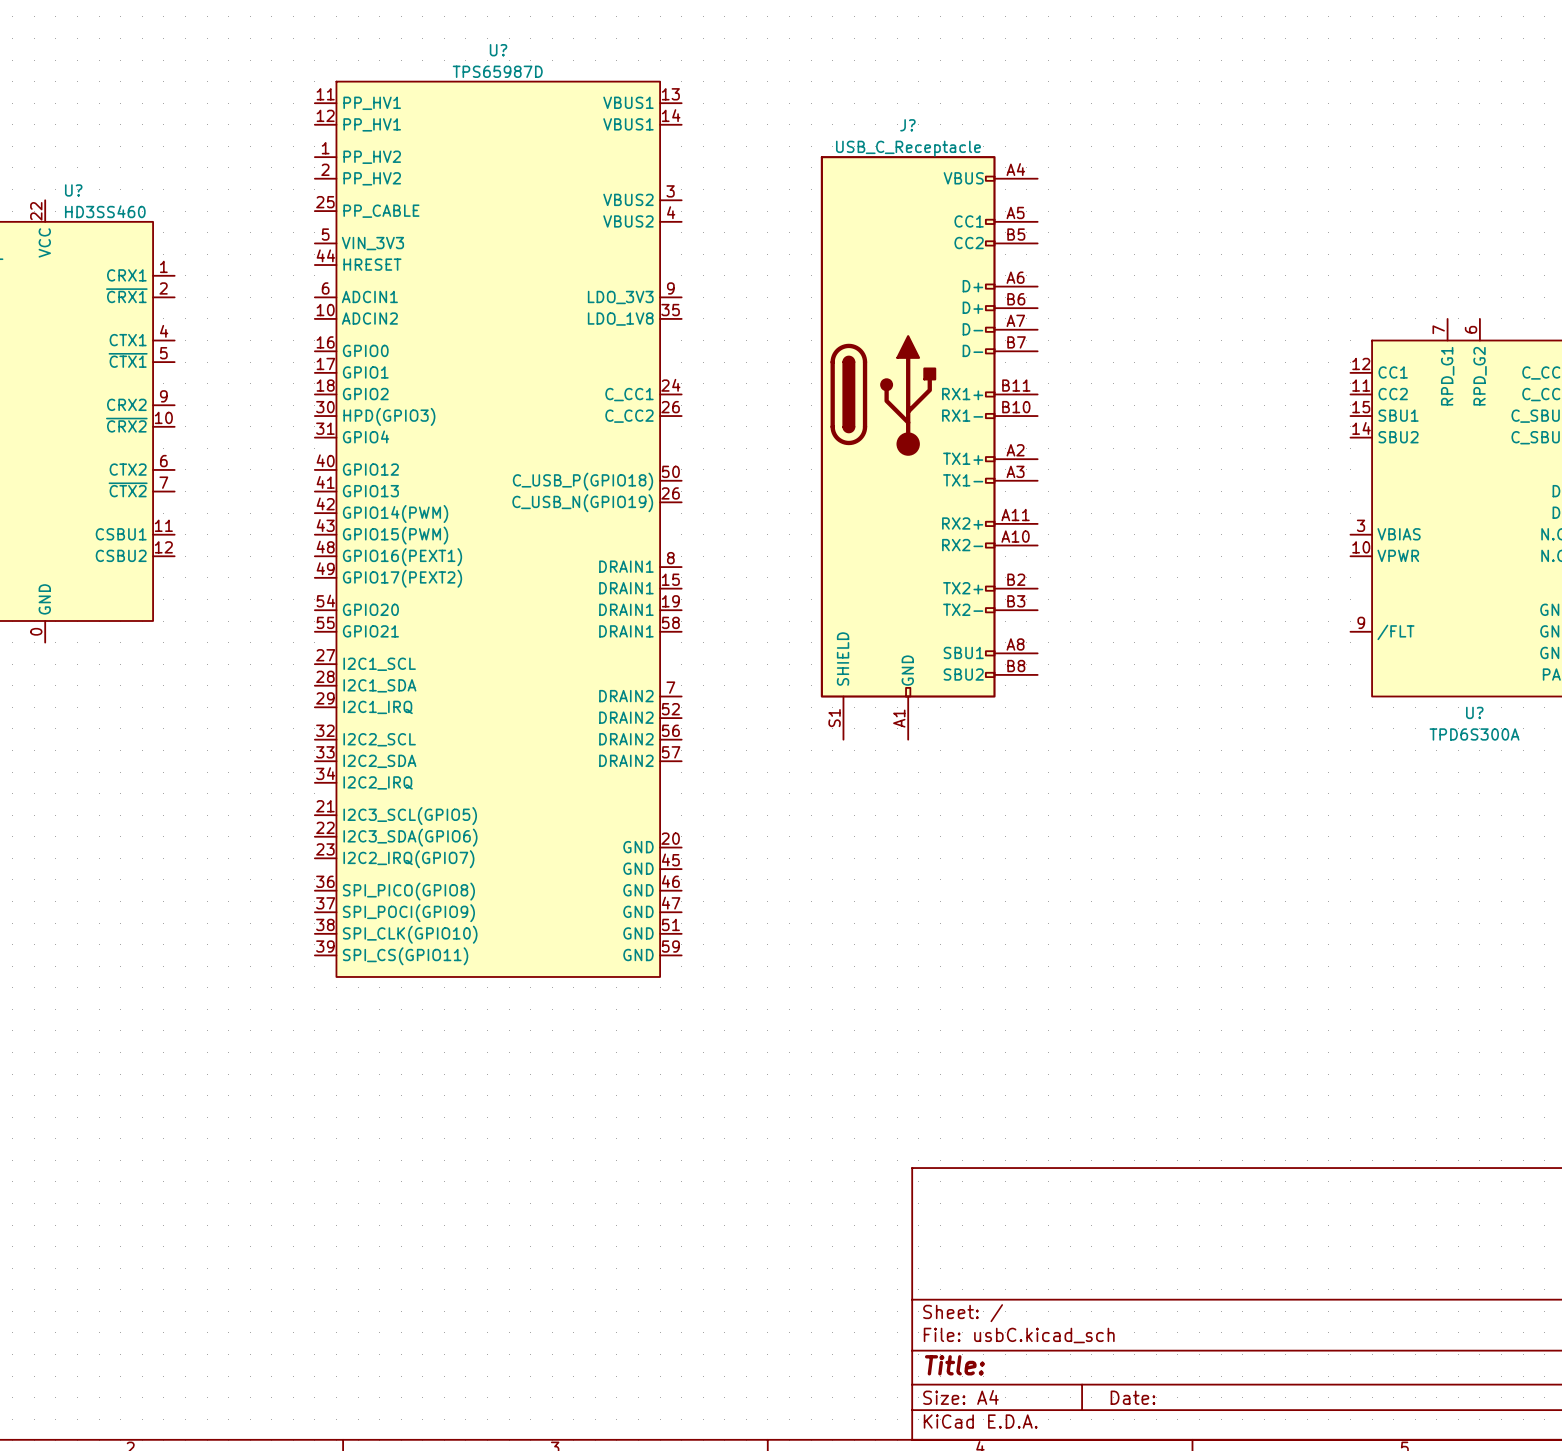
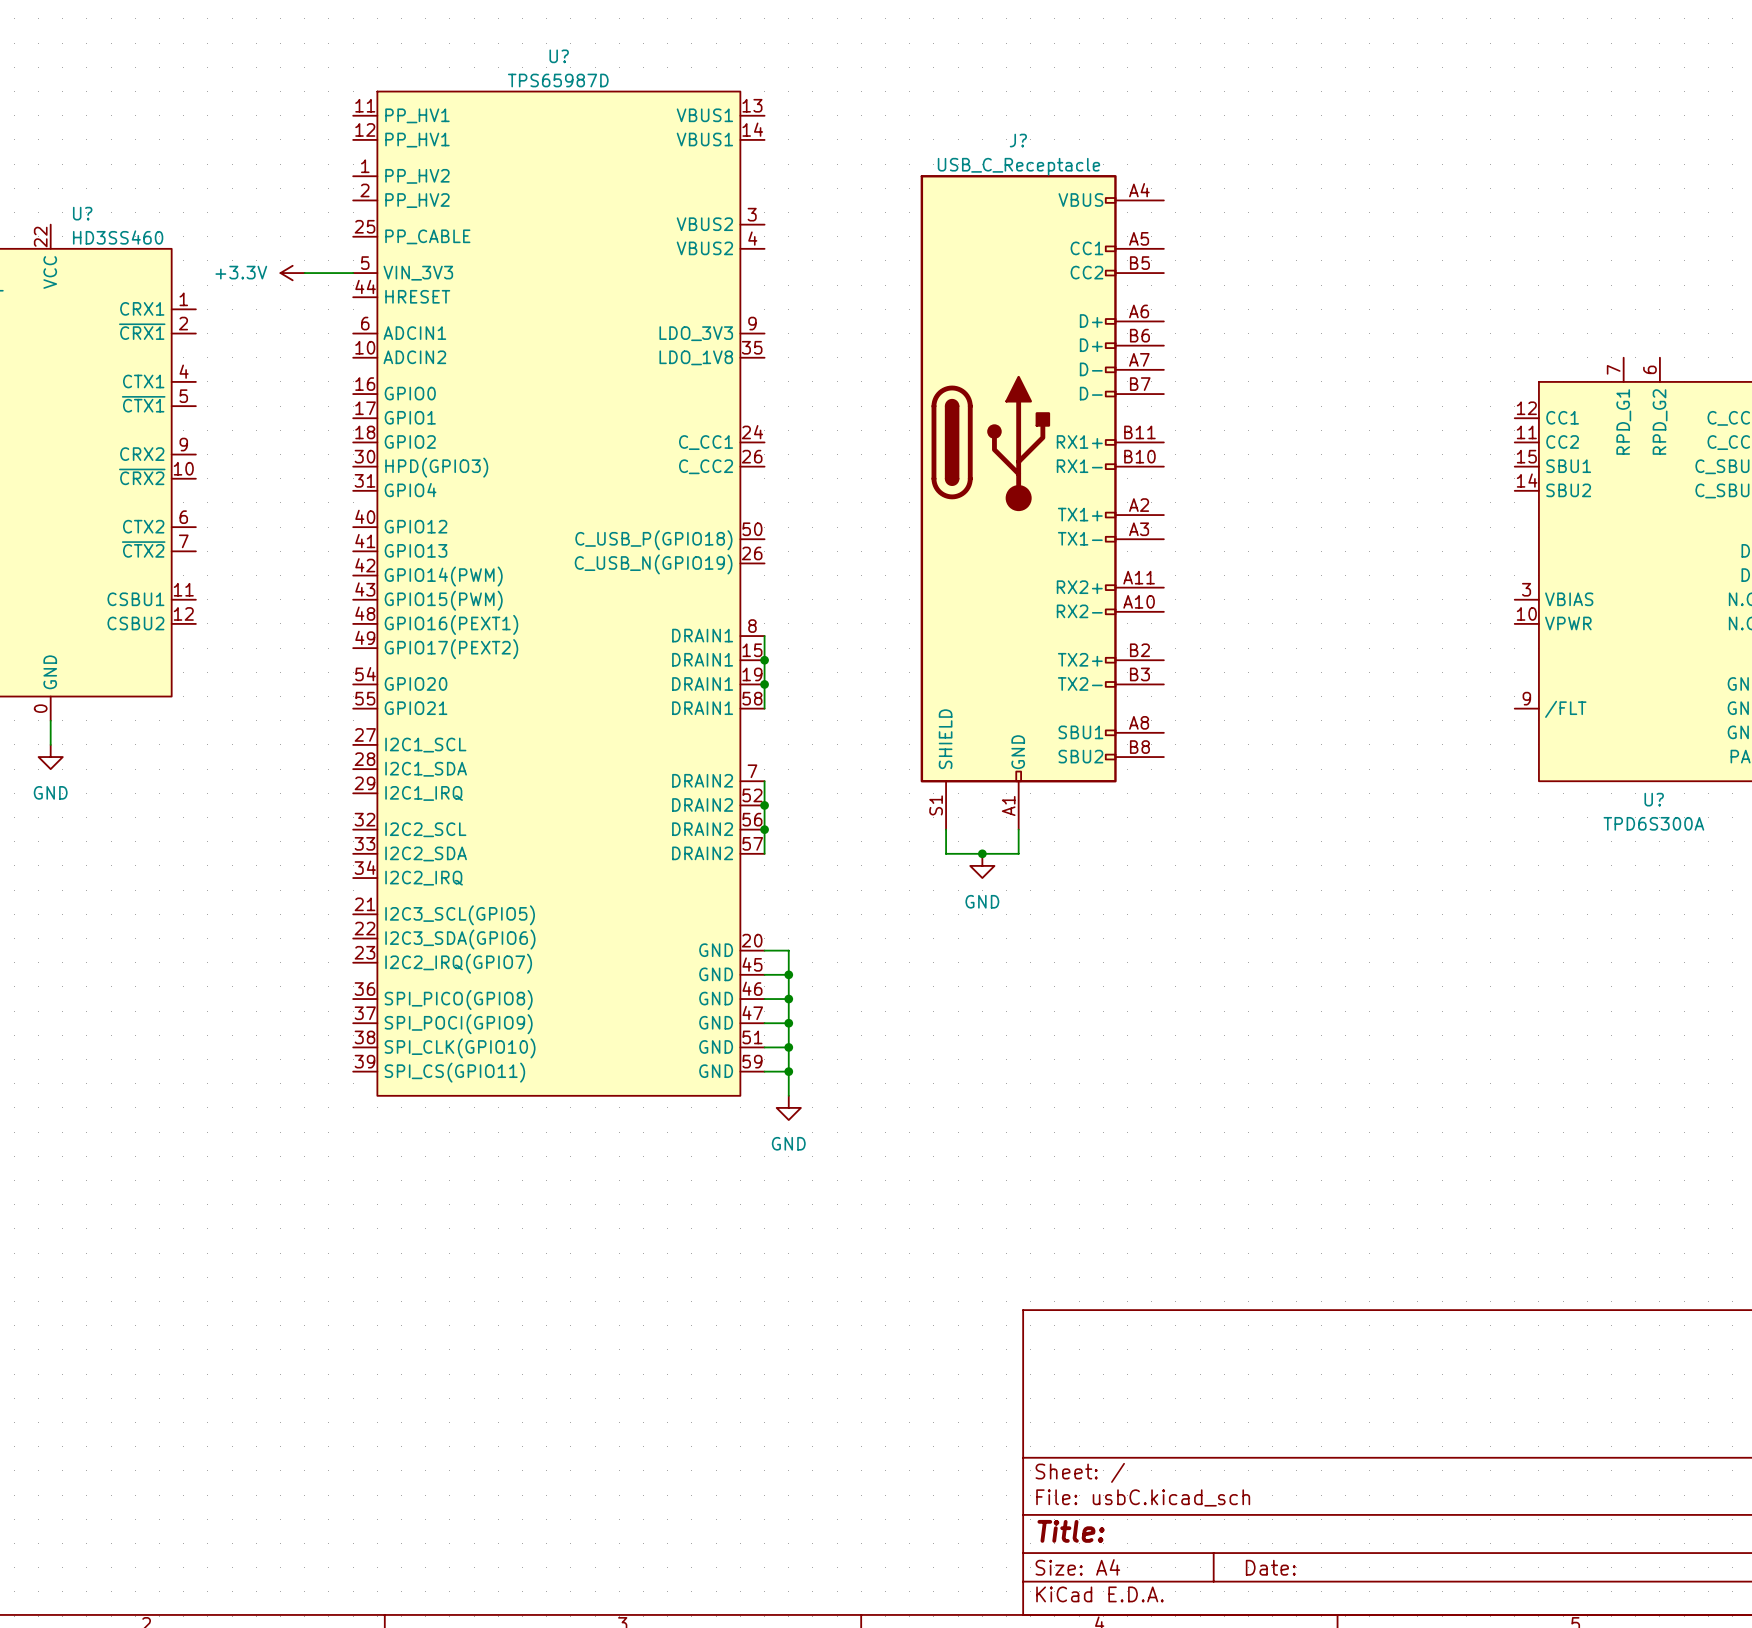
power symbol: none -> +3.3V (292, 273)
wire: none -> (304, 273) (353, 273)
wire: none -> (764, 636) (764, 708)
junction: none -> (764, 660)
junction: none -> (764, 684)
wire: none -> (50, 720) (50, 744)
power symbol: none -> GND (50, 757)
wire: none -> (764, 781) (764, 853)
junction: none -> (764, 805)
junction: none -> (764, 829)
wire: none -> (946, 829) (946, 853) (1018, 853) (1018, 829)
junction: none -> (982, 853)
power symbol: none -> GND (982, 865)
wire: none -> (764, 950) (788, 950) (788, 1095)
wire: none -> (764, 974) (788, 974)
junction: none -> (788, 974)
wire: none -> (764, 999) (788, 999)
junction: none -> (788, 999)
wire: none -> (764, 1023) (788, 1023)
junction: none -> (788, 1023)
wire: none -> (764, 1047) (788, 1047)
junction: none -> (788, 1047)
wire: none -> (764, 1071) (788, 1071)
junction: none -> (788, 1071)
power symbol: none -> GND (788, 1107)

